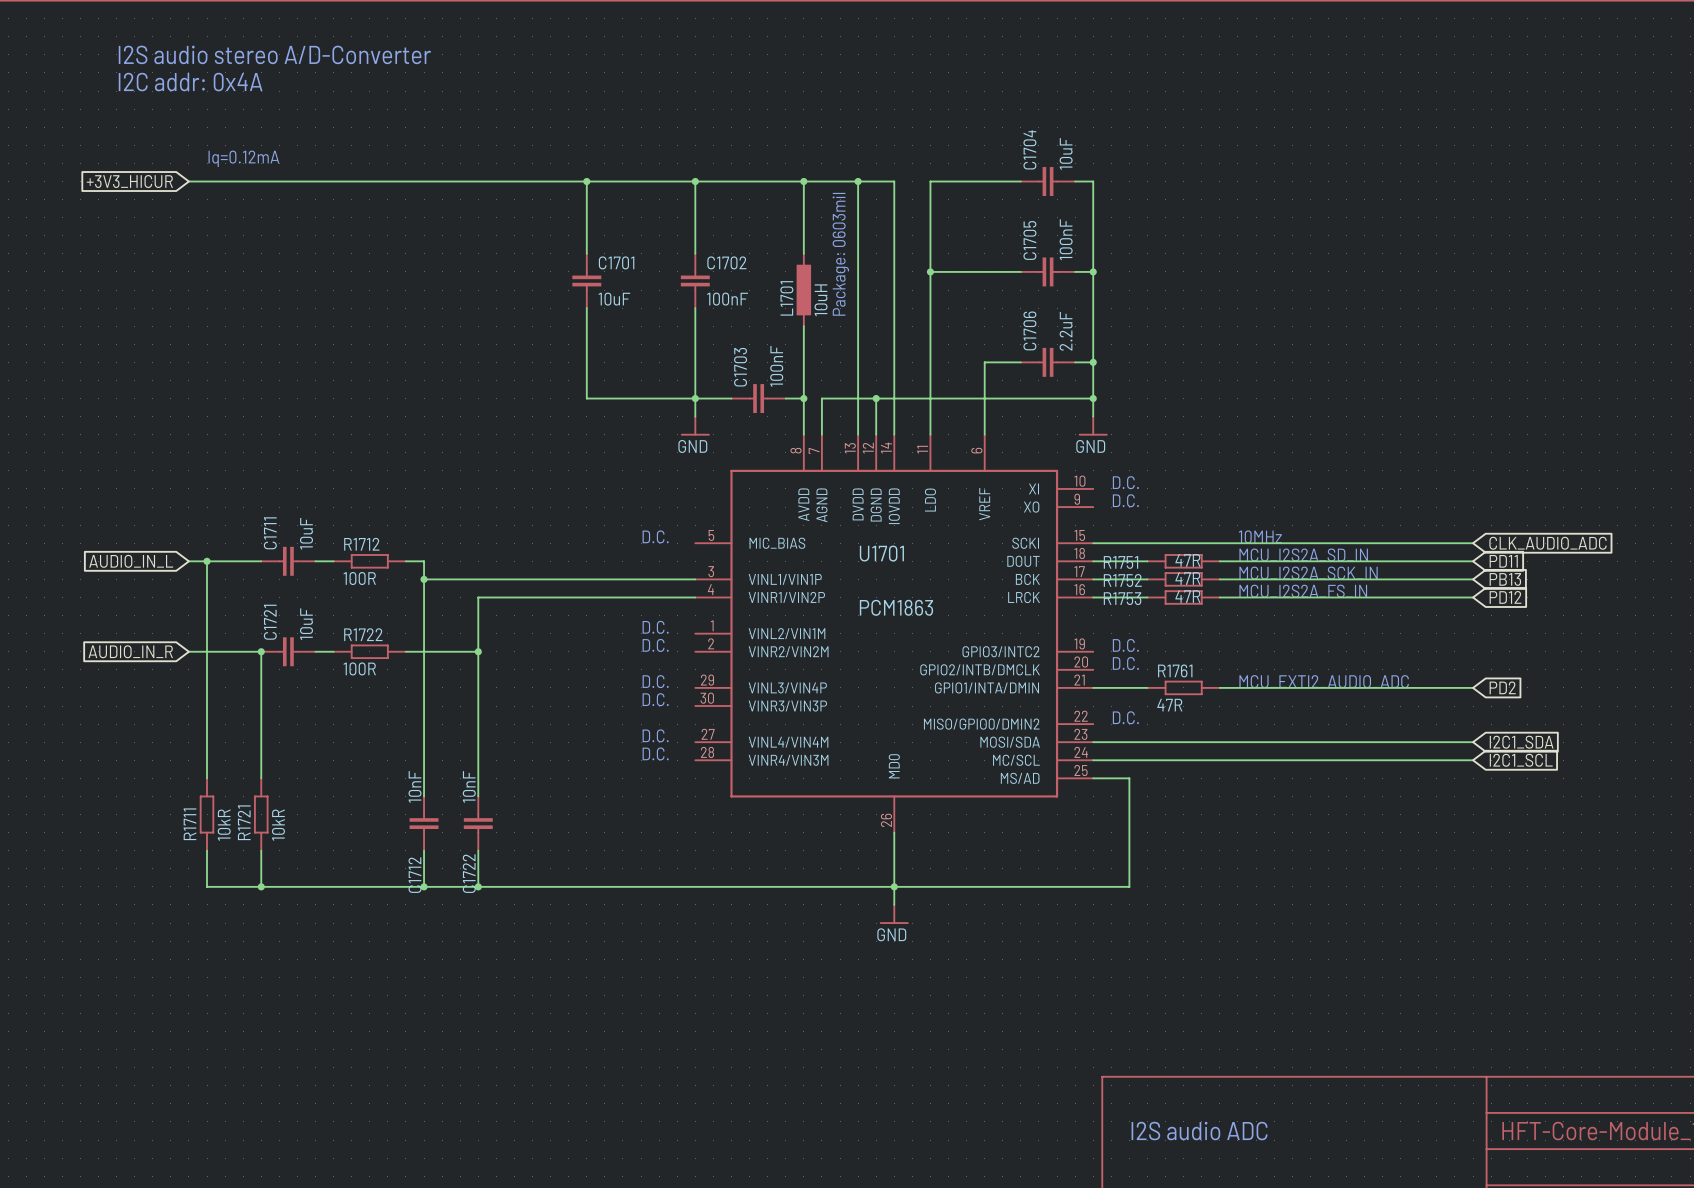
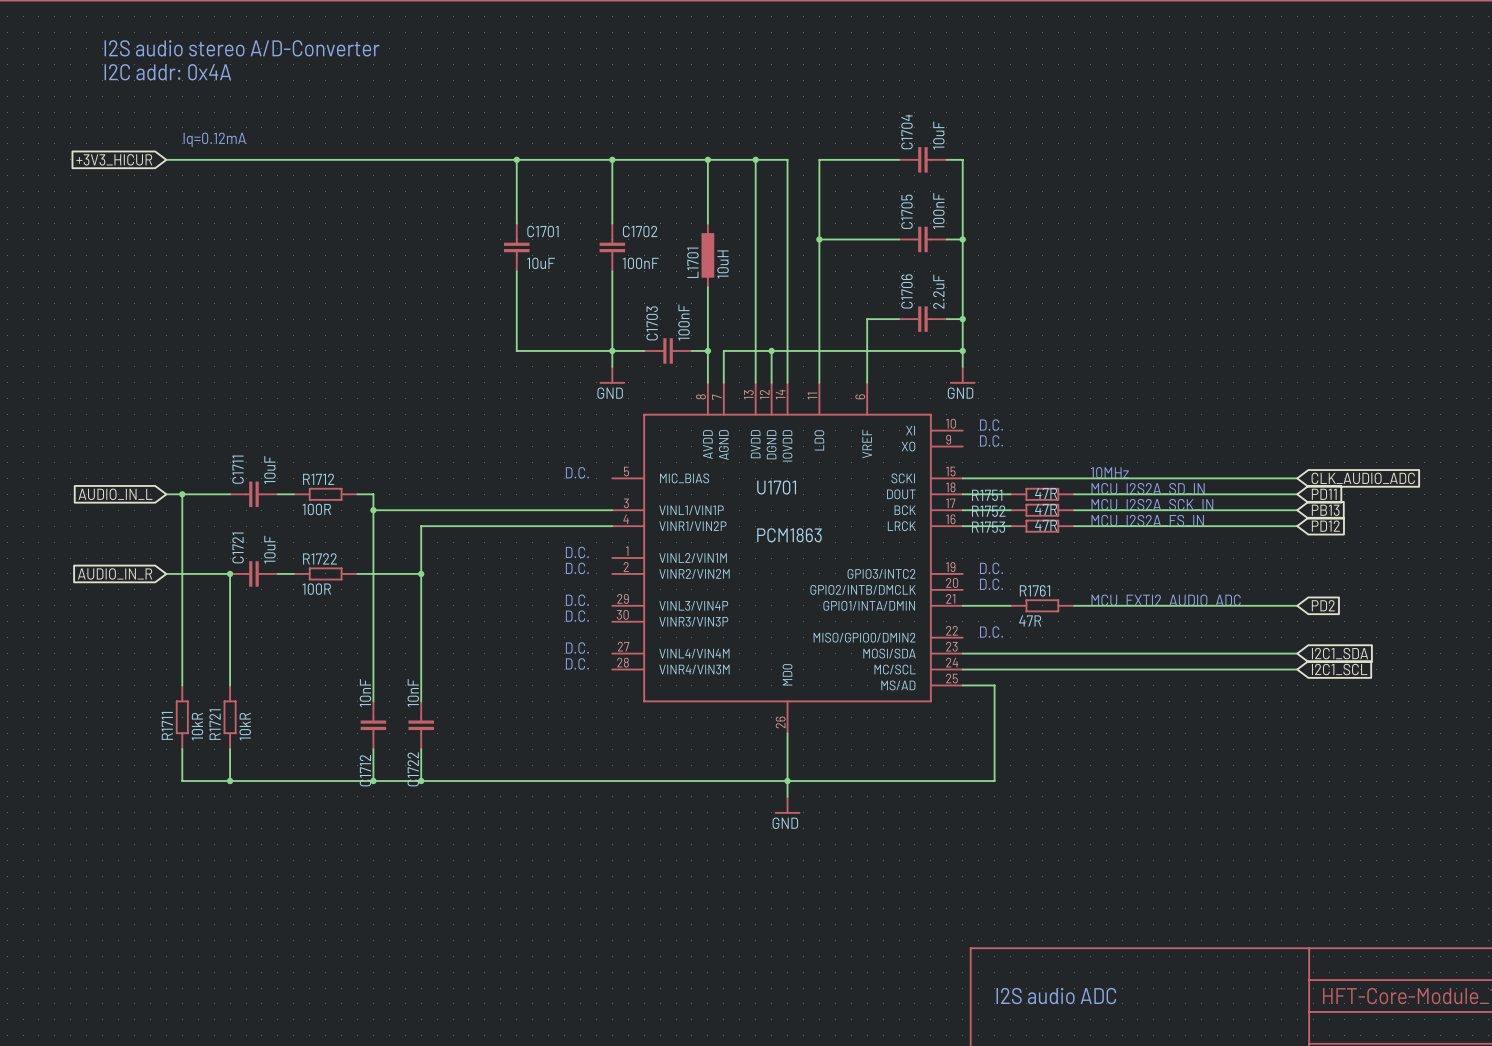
text: Package: 0603mil (840, 254) -> none

